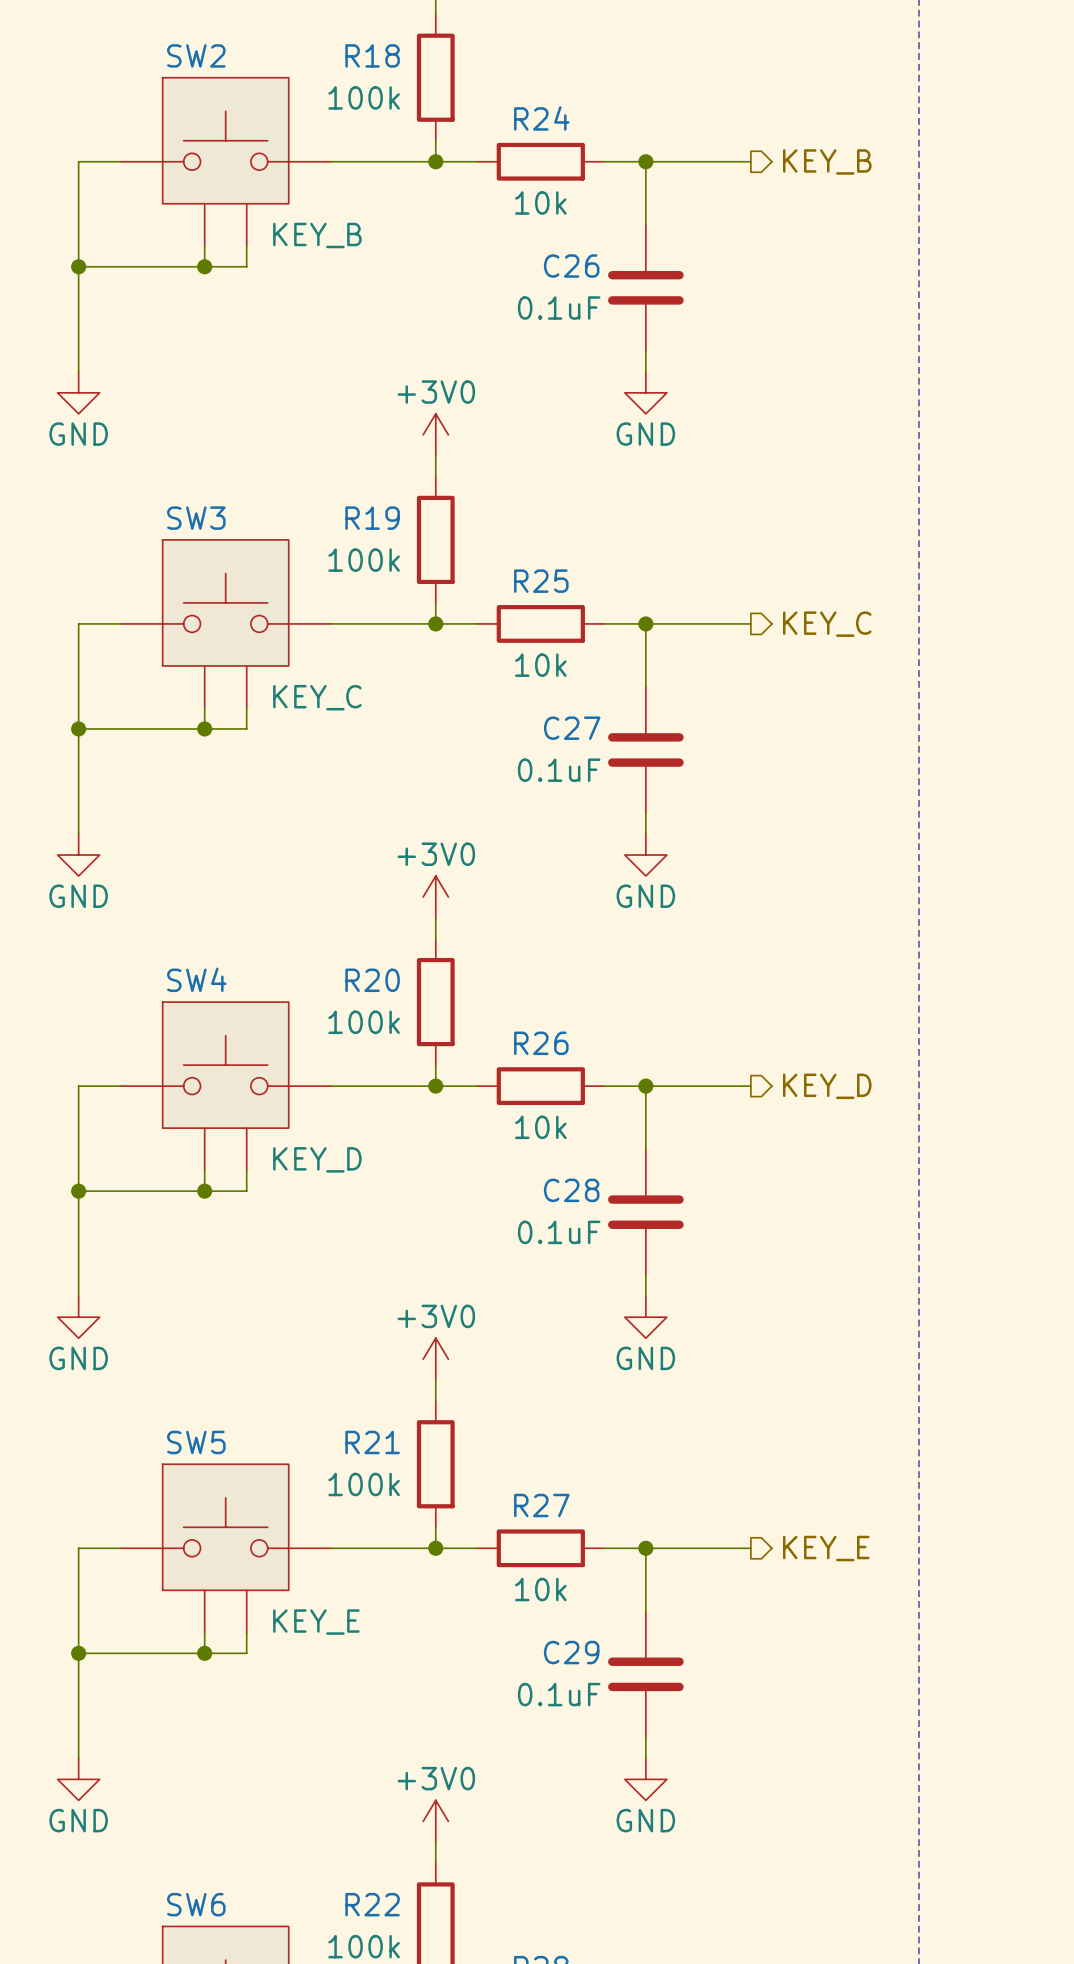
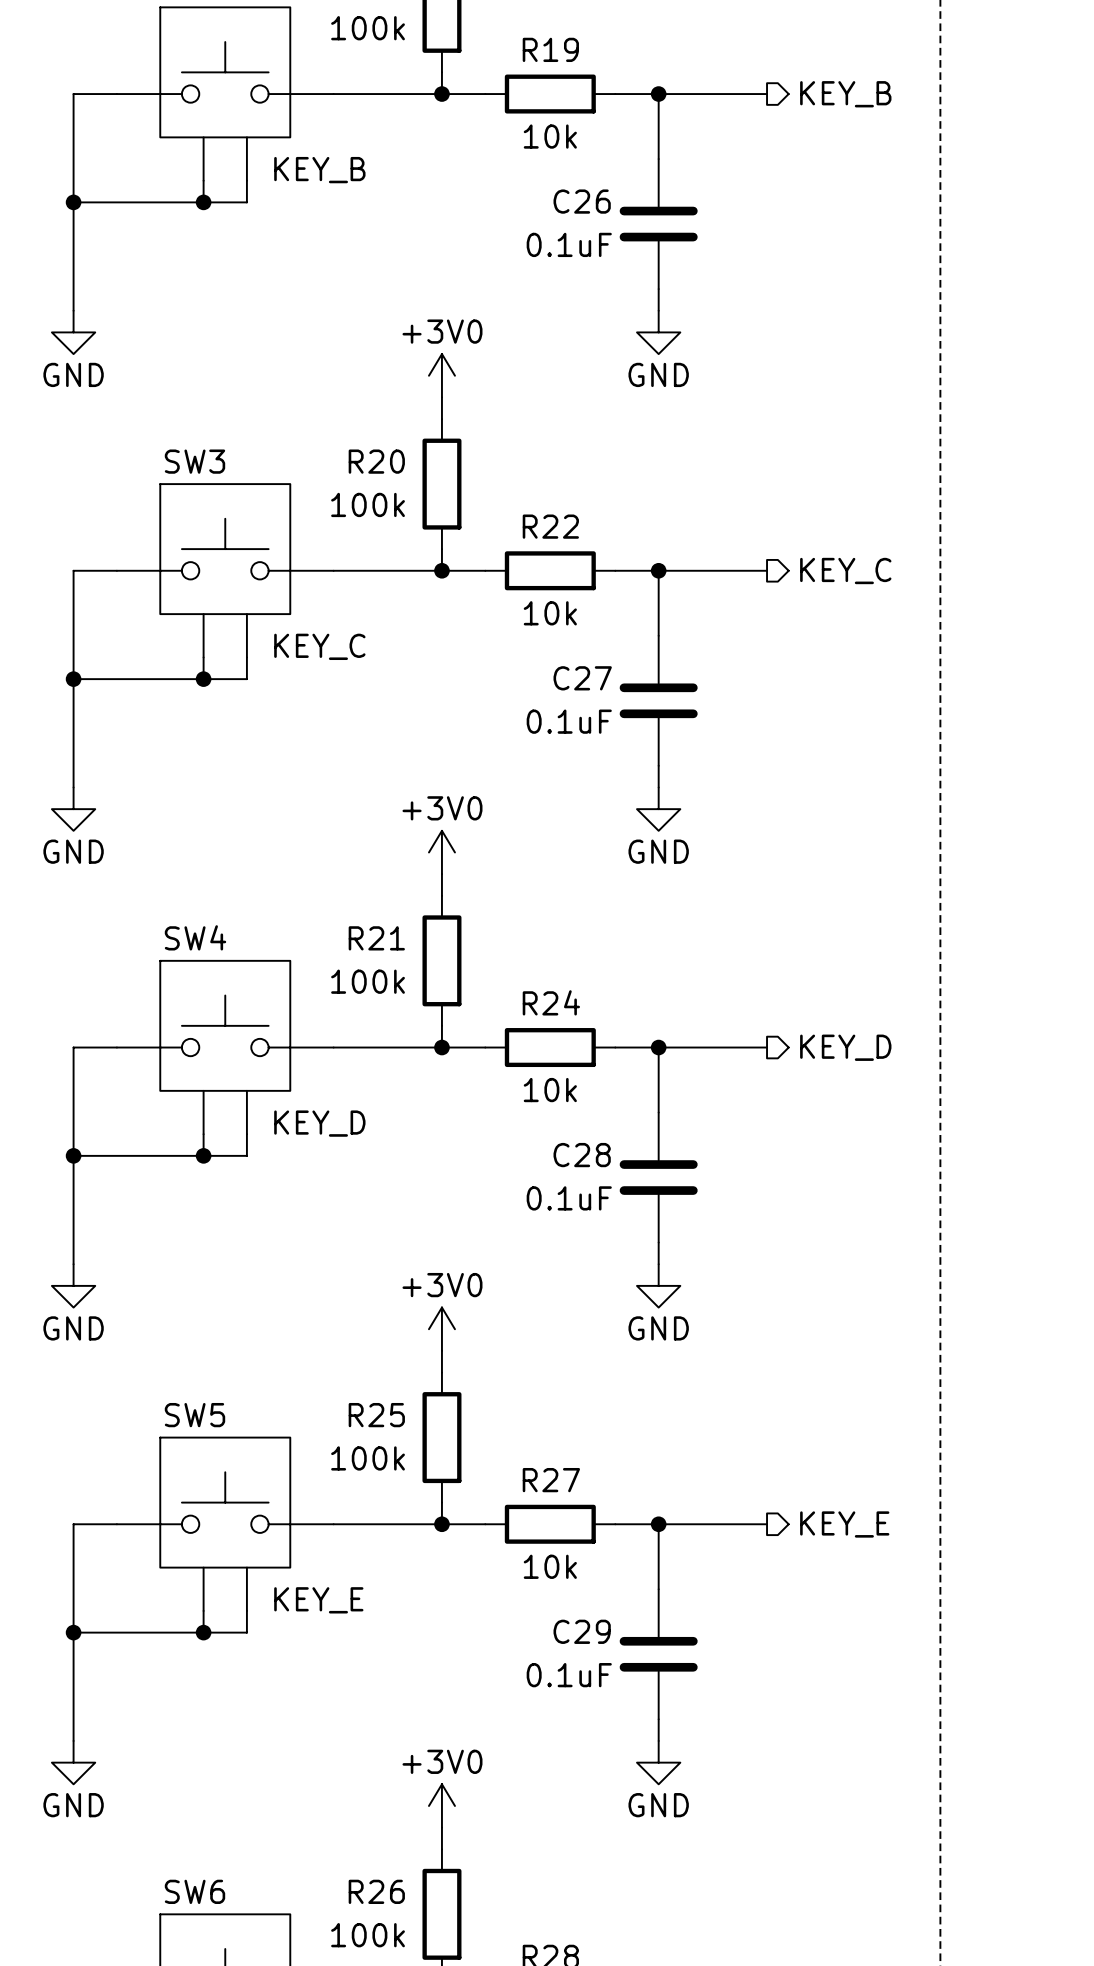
R24 name: R24 (541, 118) -> R19 (550, 49)
R19 name: R19 (372, 518) -> R20 (376, 461)
R25 name: R25 (541, 581) -> R22 (550, 526)
R20 name: R20 (372, 980) -> R21 (376, 938)
R26 name: R26 (541, 1043) -> R24 (551, 1002)
R21 name: R21 (372, 1442) -> R25 (376, 1415)
R22 name: R22 (372, 1904) -> R26 (376, 1891)

